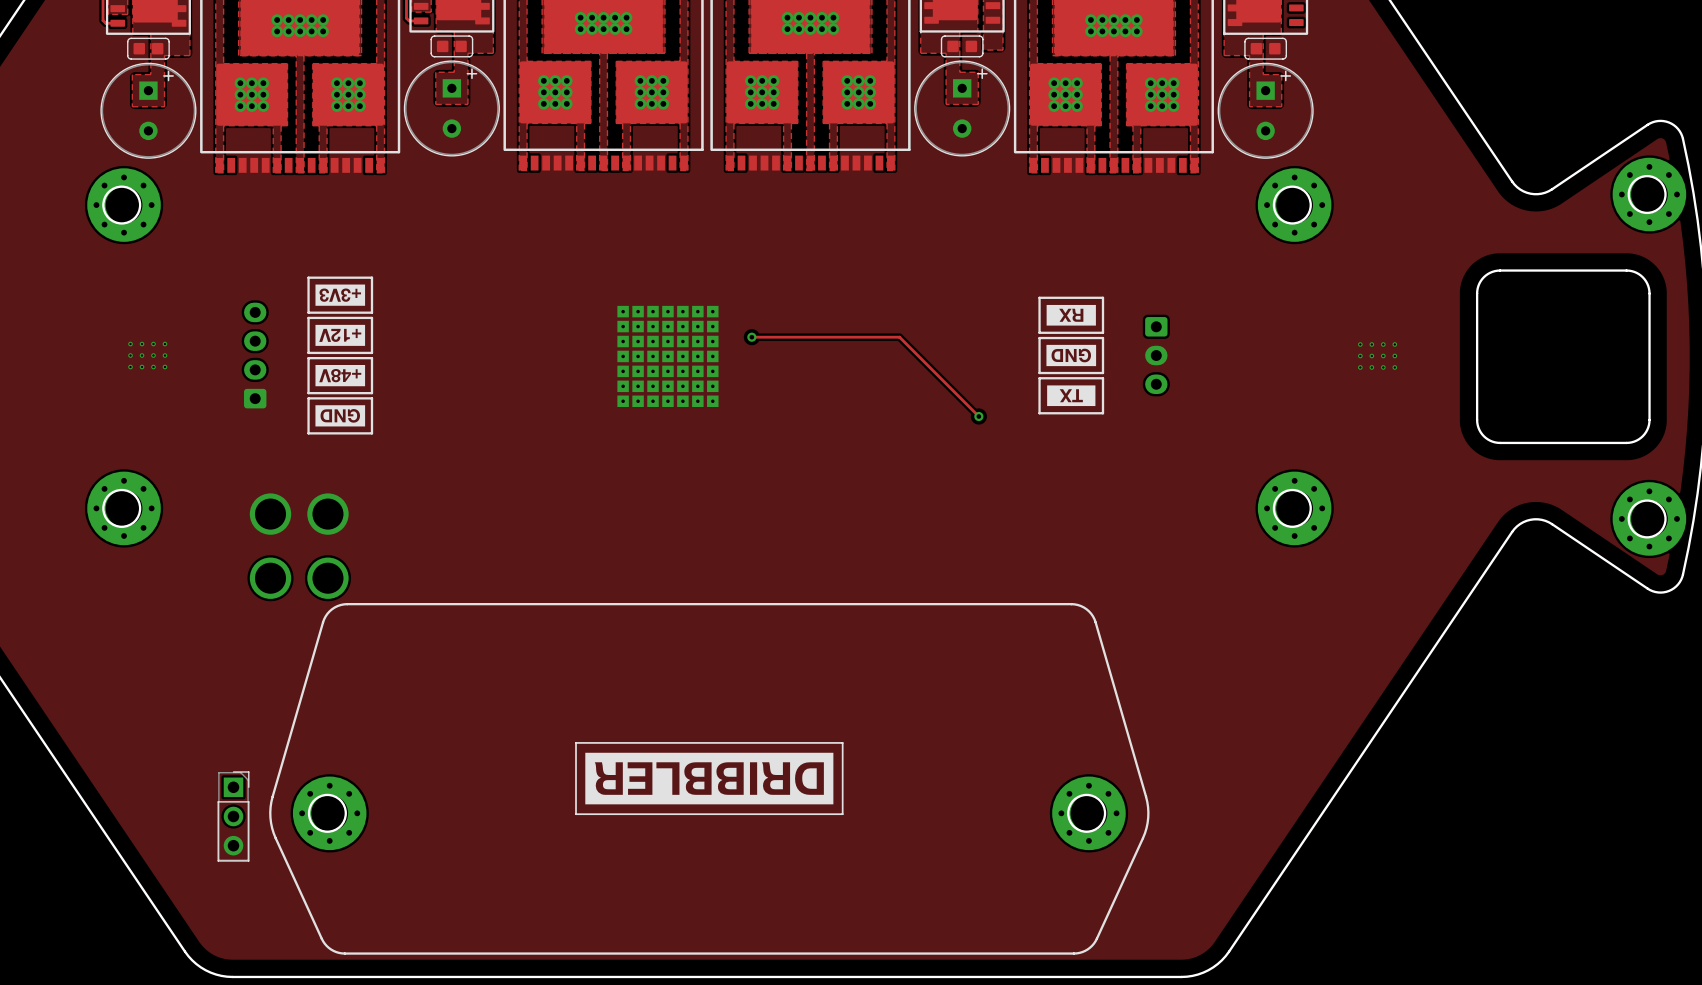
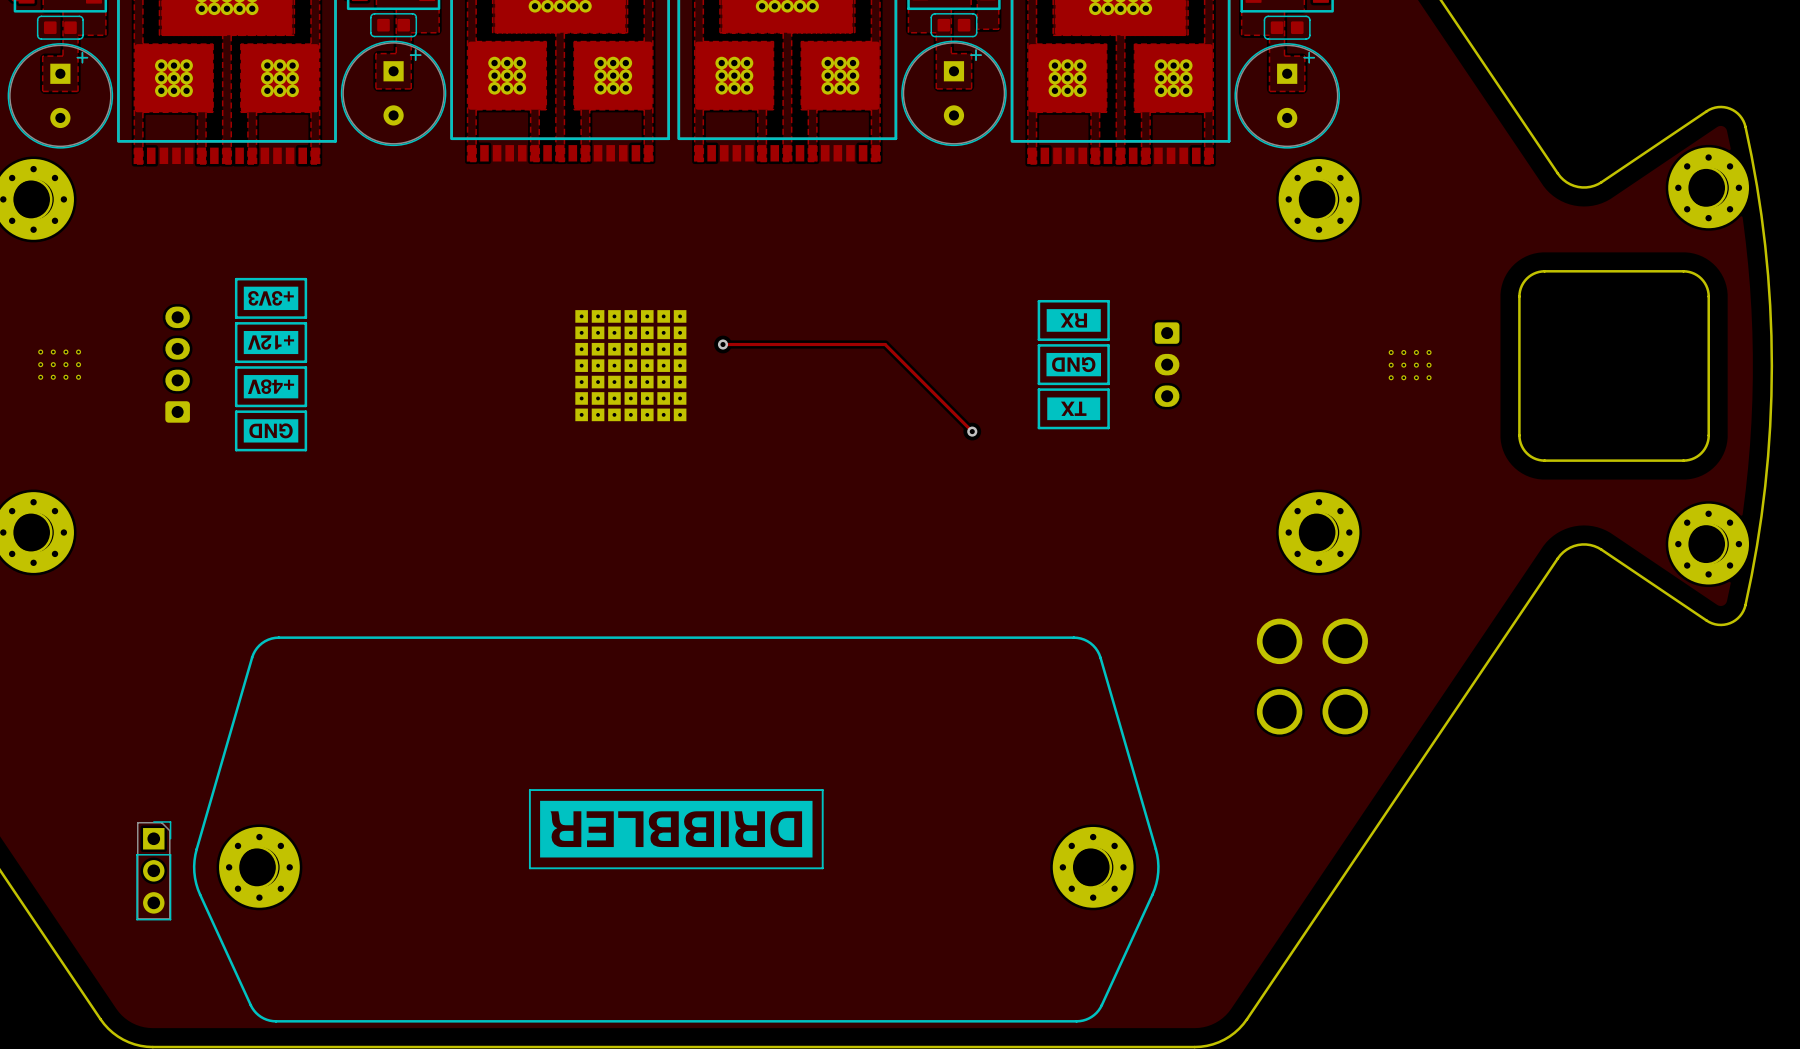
part: (270, 546) -> none
part: (327, 546) -> none
part: none -> (1279, 676)
part: none -> (1345, 676)

